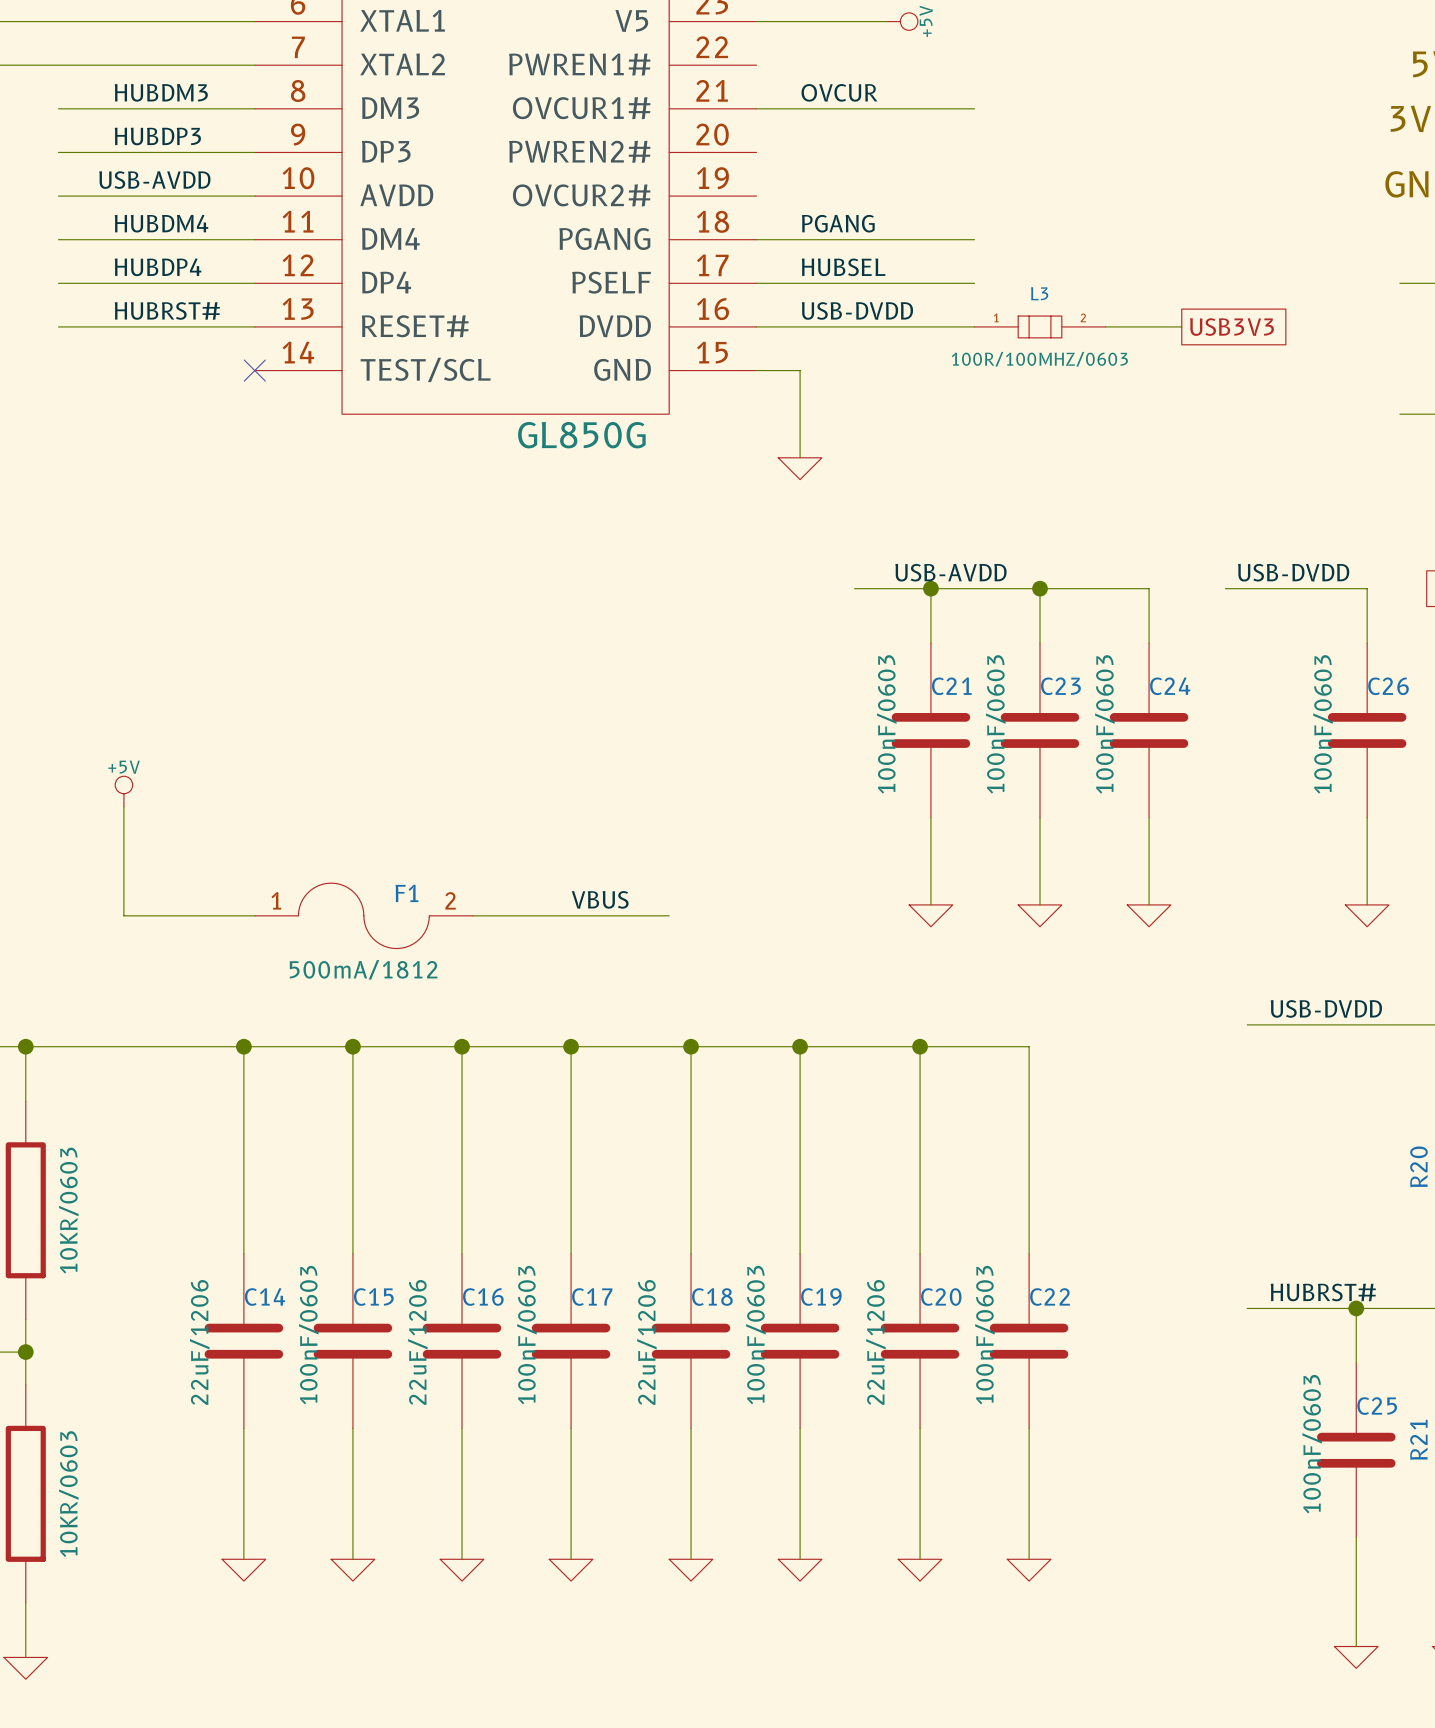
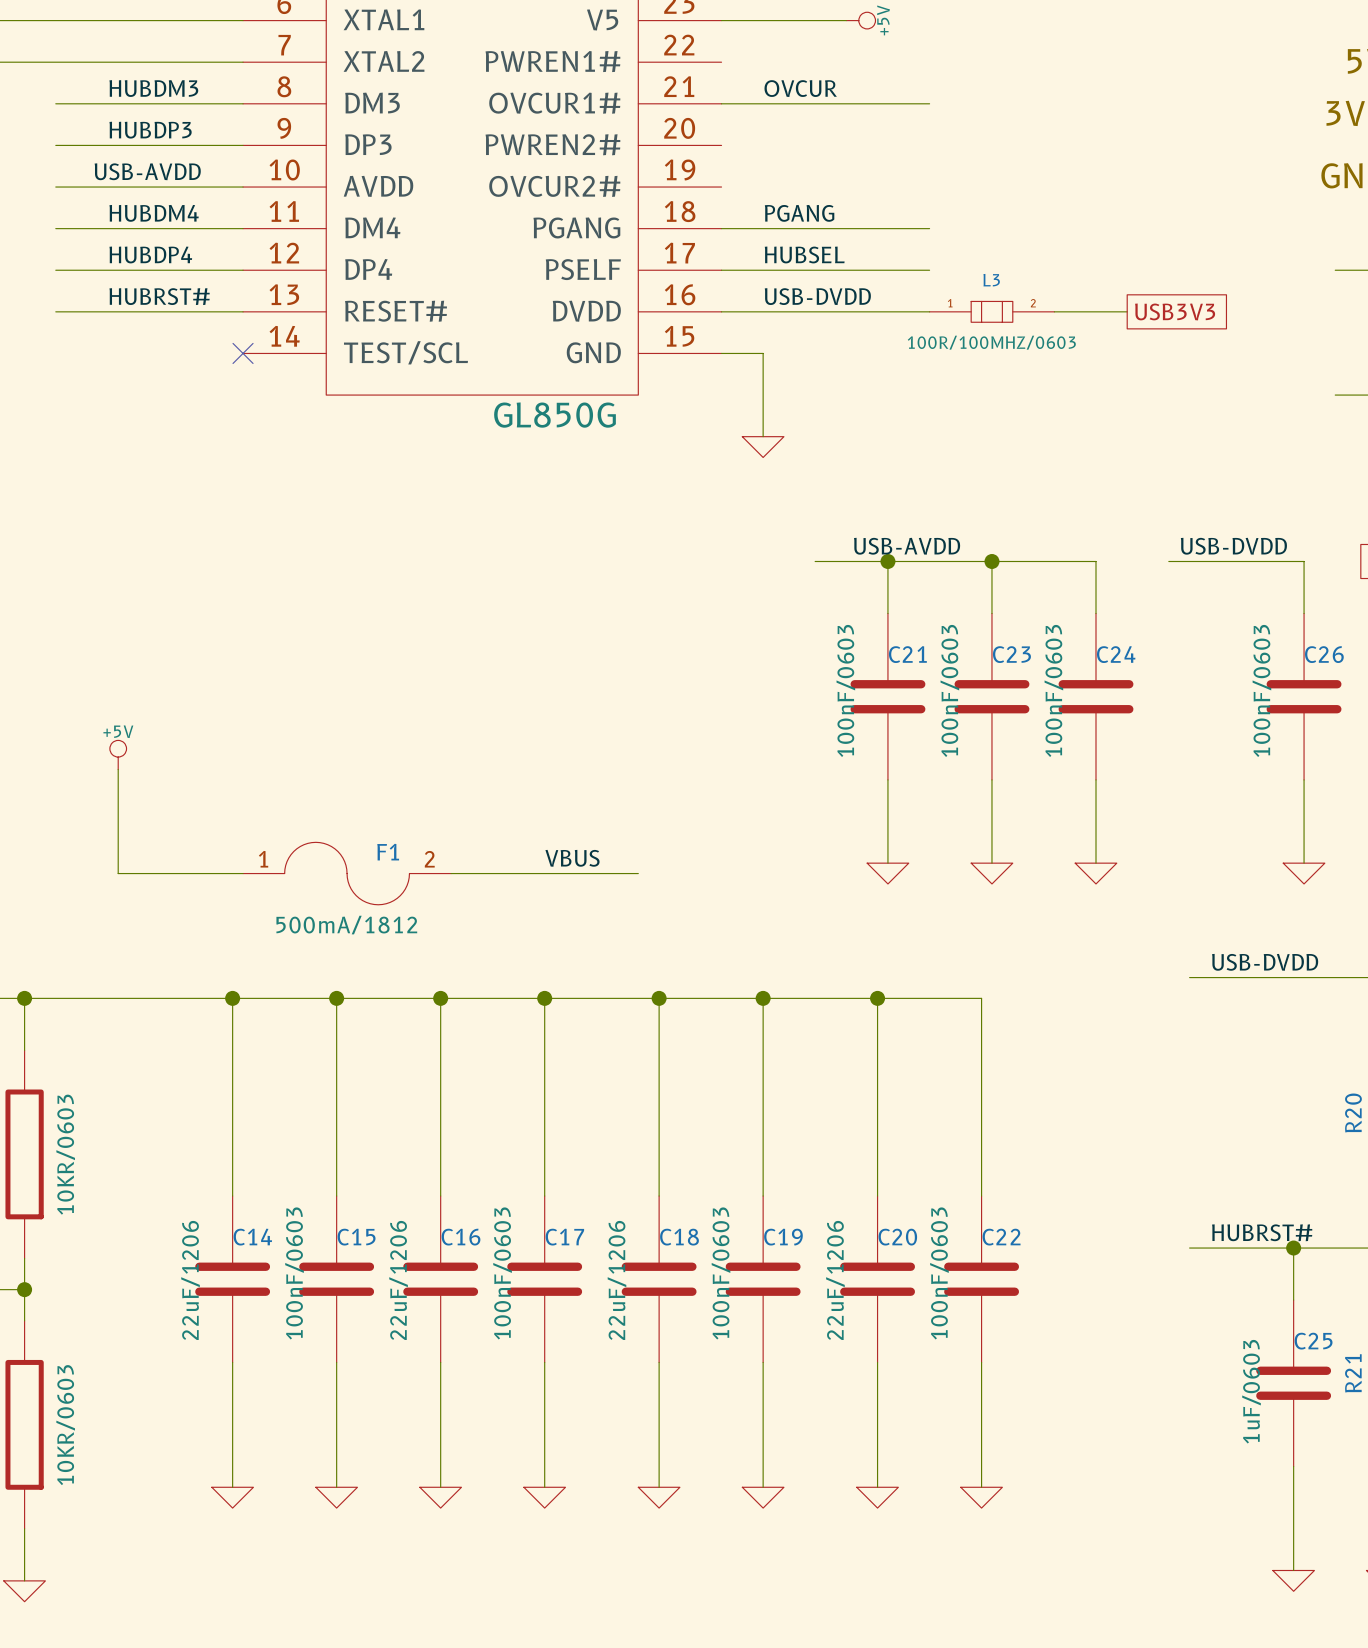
C25 value: 100nF/0603 (1312, 1444) -> 1uF/0603 (1251, 1391)

